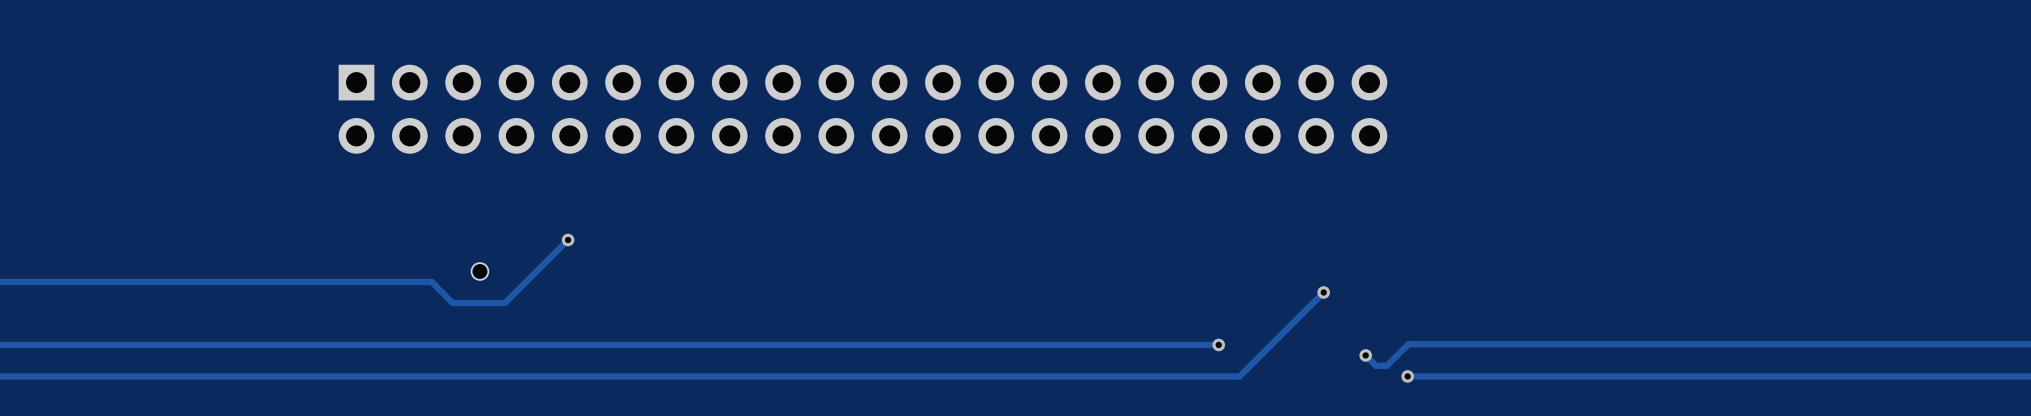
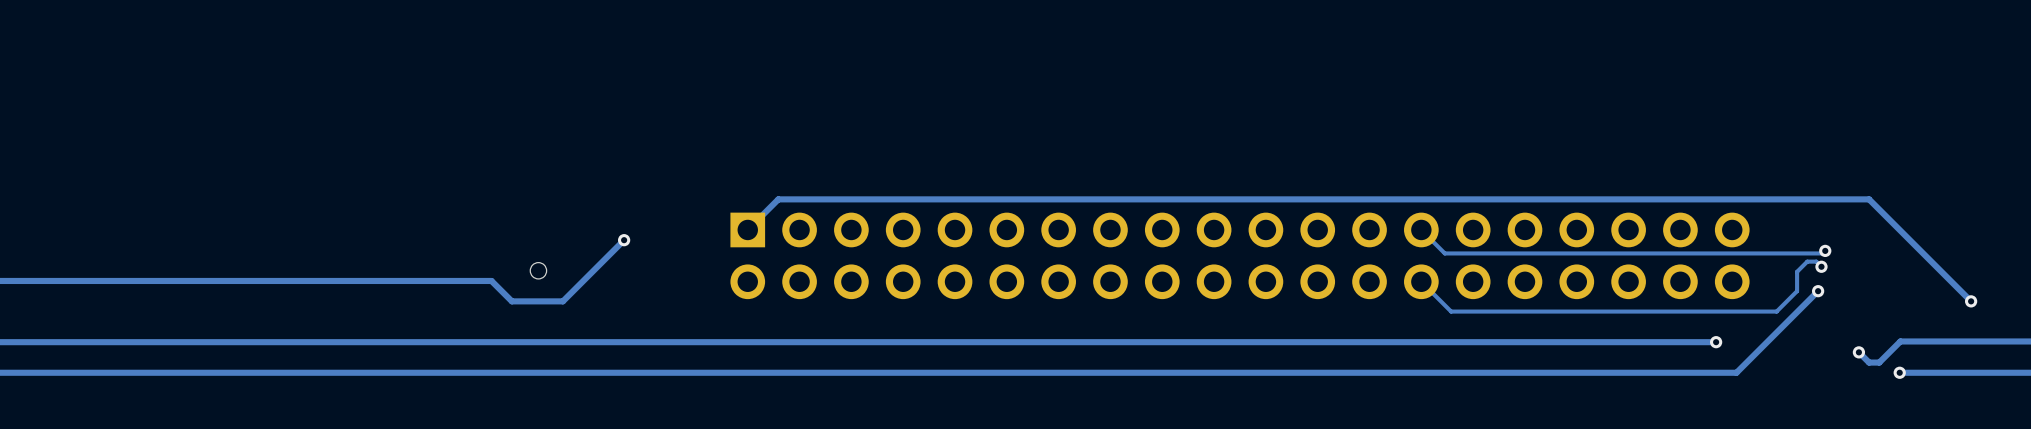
part position: (862, 109) -> (1240, 255)
track: none -> (747, 229) (778, 199) (1869, 199) (1971, 301)
track: none -> (1421, 229) (1444, 253) (1824, 253) (1825, 250)
via: none -> (1825, 250)
track: none -> (1821, 266) (1816, 261) (1807, 261) (1797, 271) (1797, 291) (1776, 311) (1451, 311) (1421, 281)
via: none -> (1821, 266)
track: (1323, 292) (1239, 376) -> (1440, 372) (1276, 372)
via: (1323, 292) -> none
via: none -> (1818, 291)
via: none -> (1971, 301)
via: (1218, 344) -> none
track: none -> (1716, 342) (1256, 342)
via: none -> (1716, 342)
track: (1881, 344) (1408, 344) (1386, 365) (1376, 365) (1365, 355) -> (1900, 341) (1879, 362) (1869, 362) (1858, 352)
via: (1365, 355) -> none
via: none -> (1858, 352)
via: (1407, 376) -> none
track: (1880, 376) (1712, 376) -> (1818, 291) (1736, 372)
via: none -> (1899, 372)

